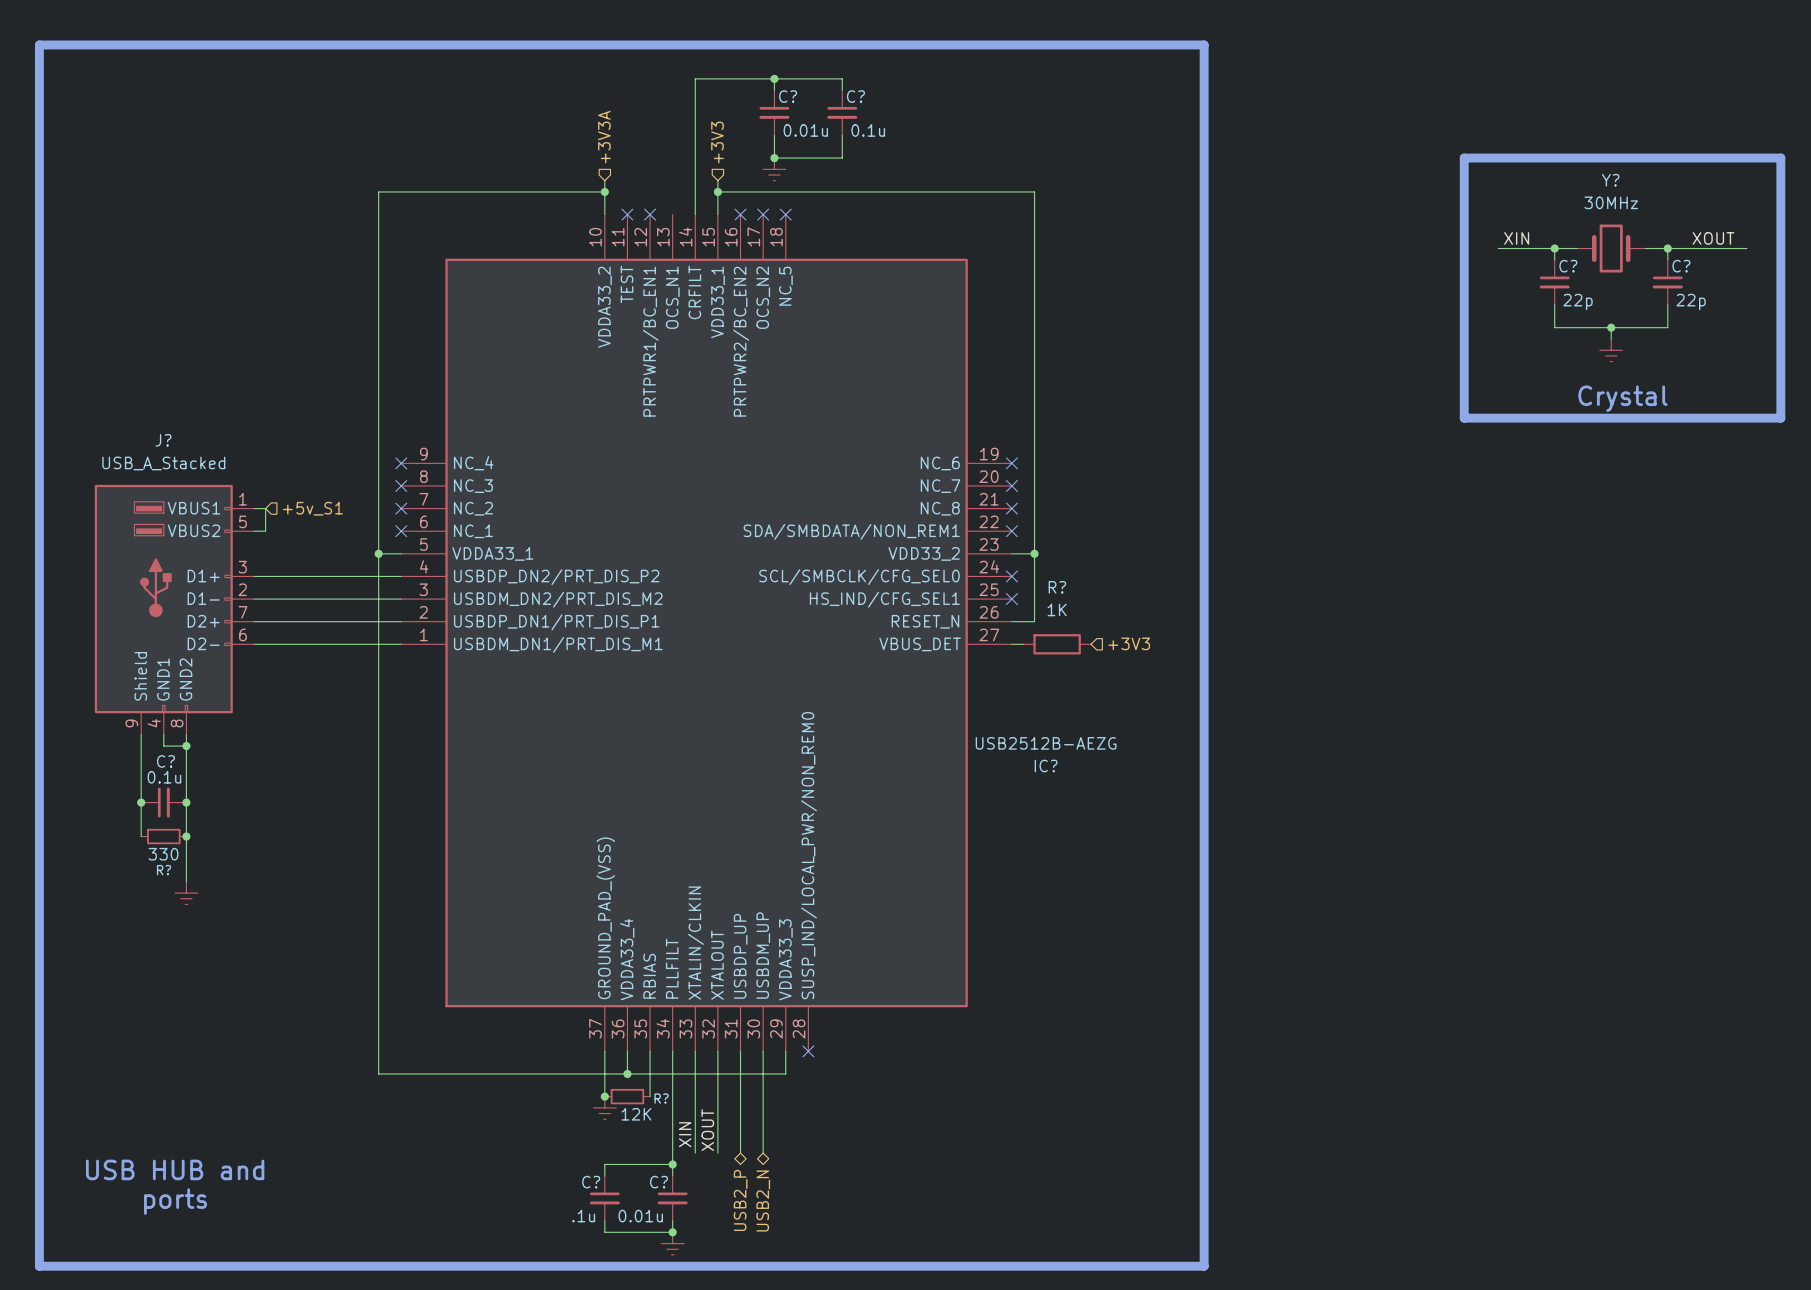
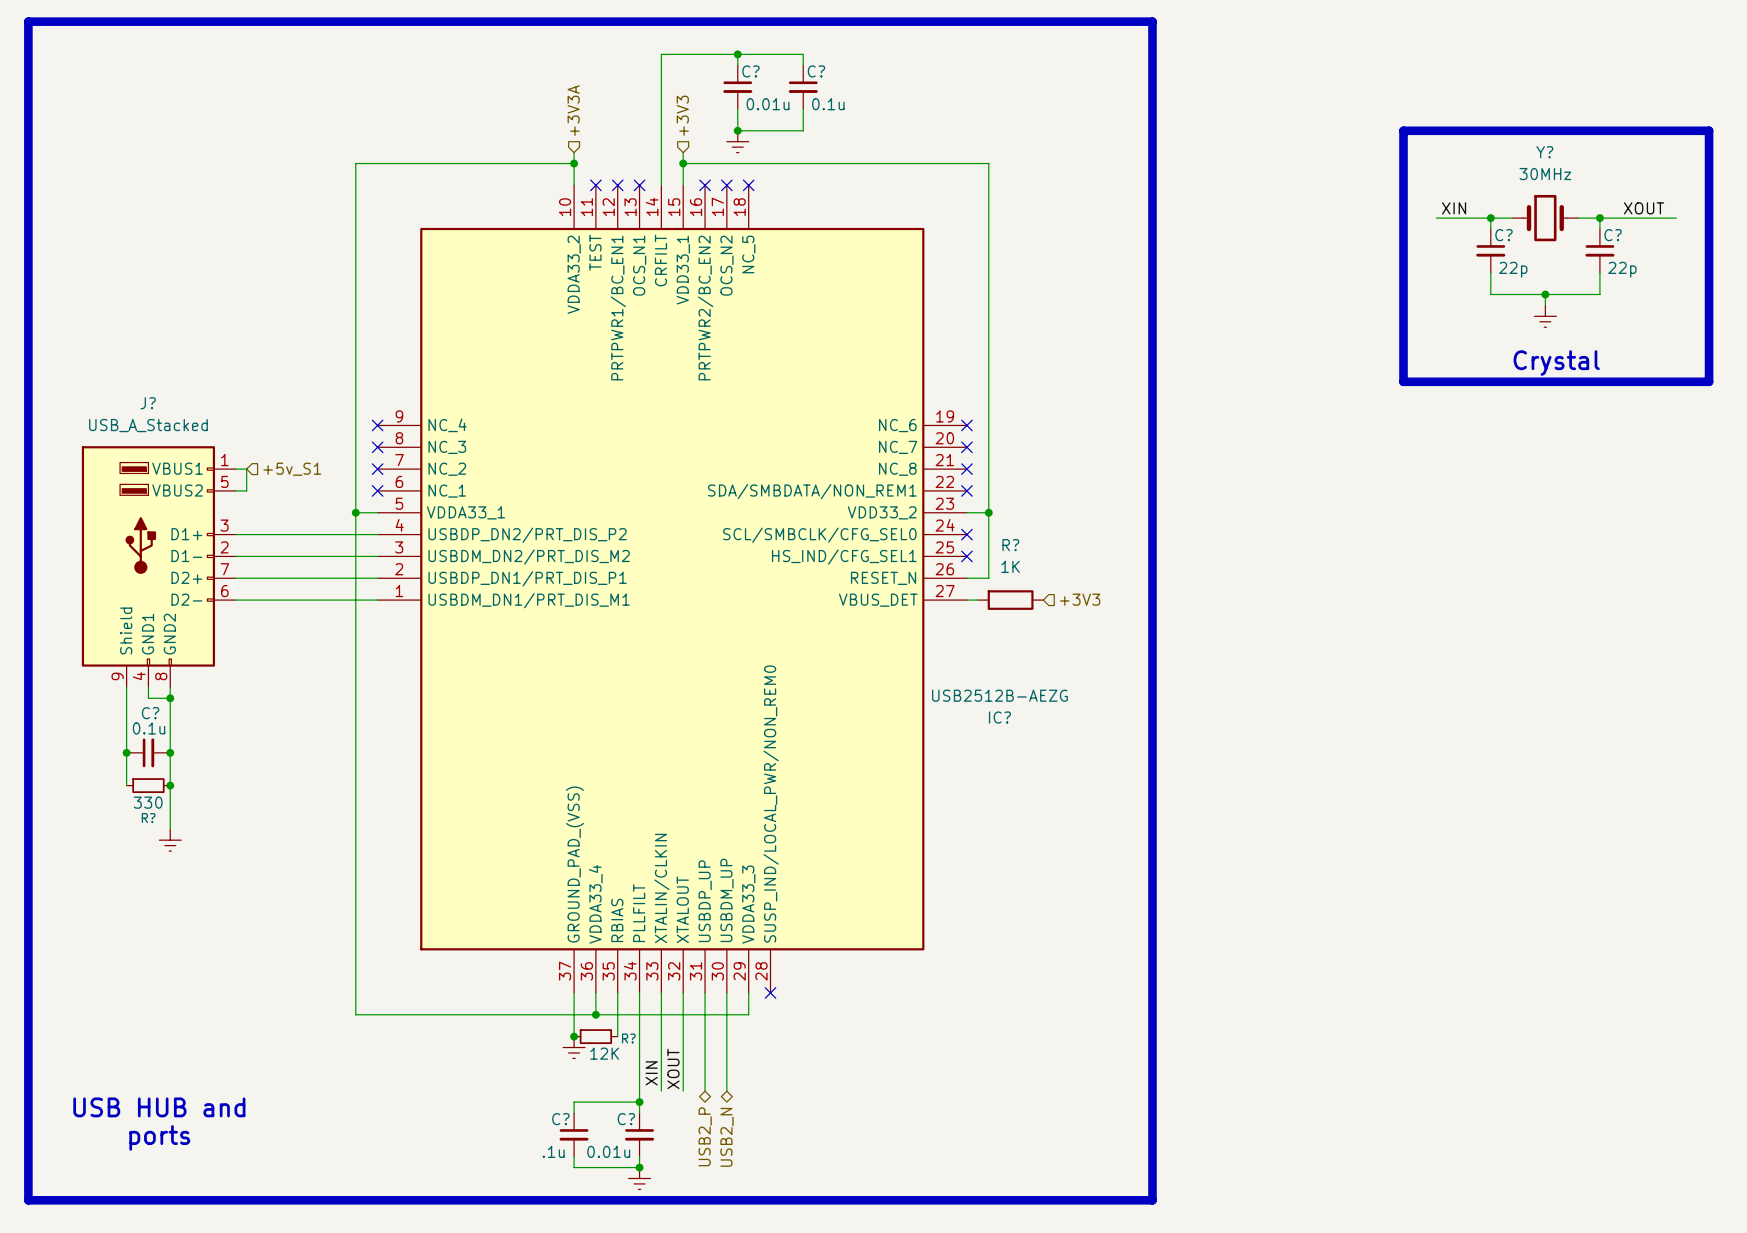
no-connect mark: none -> (639, 185)

